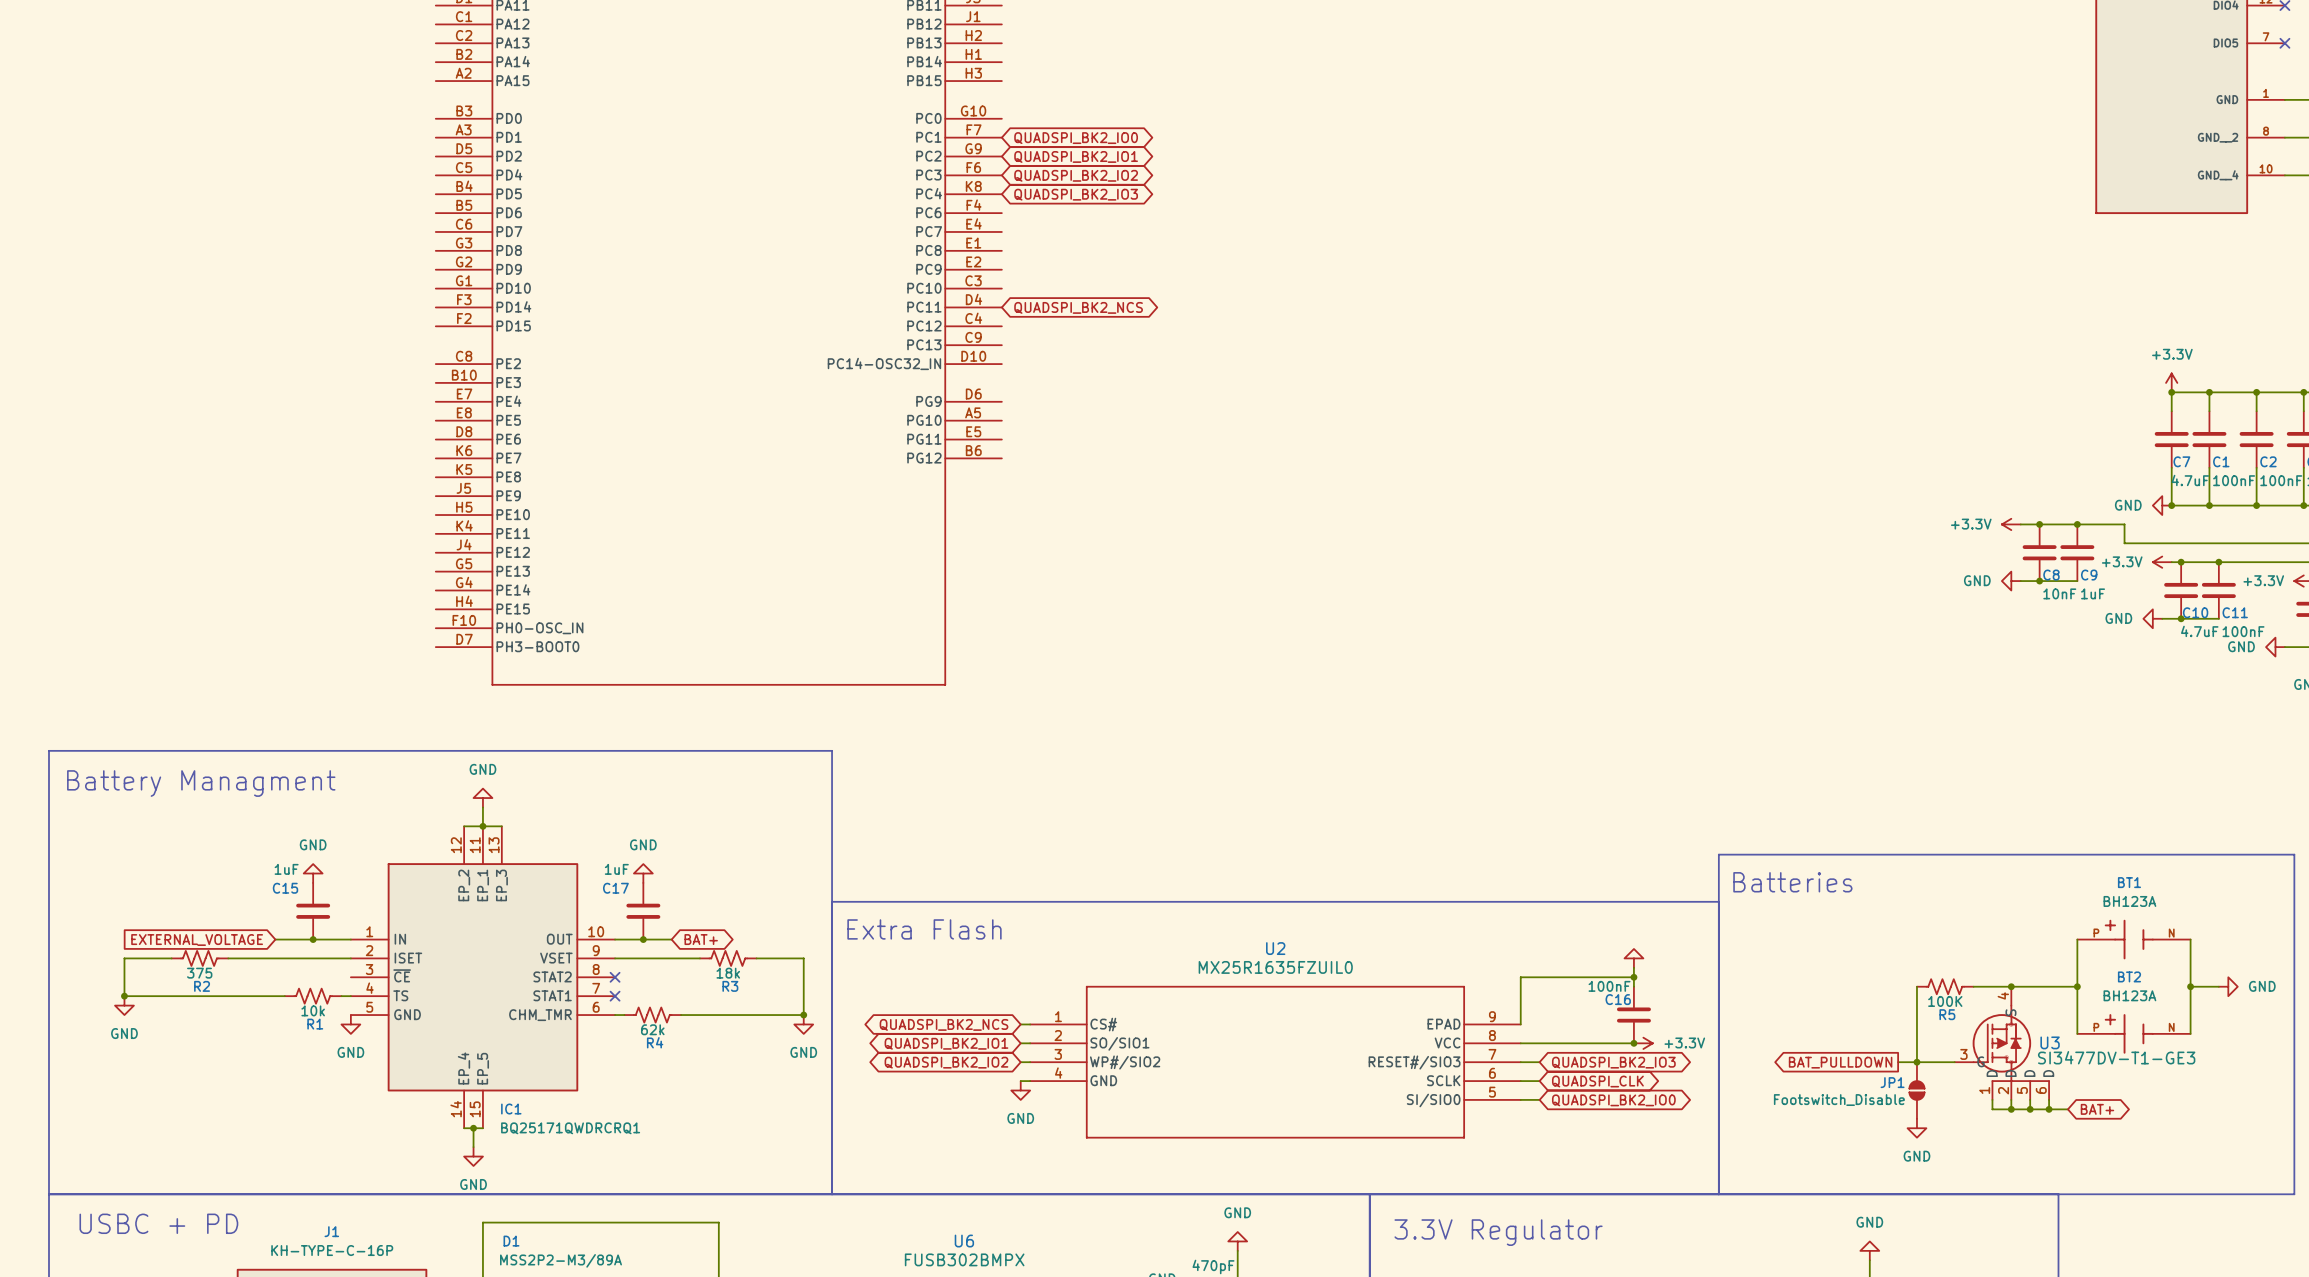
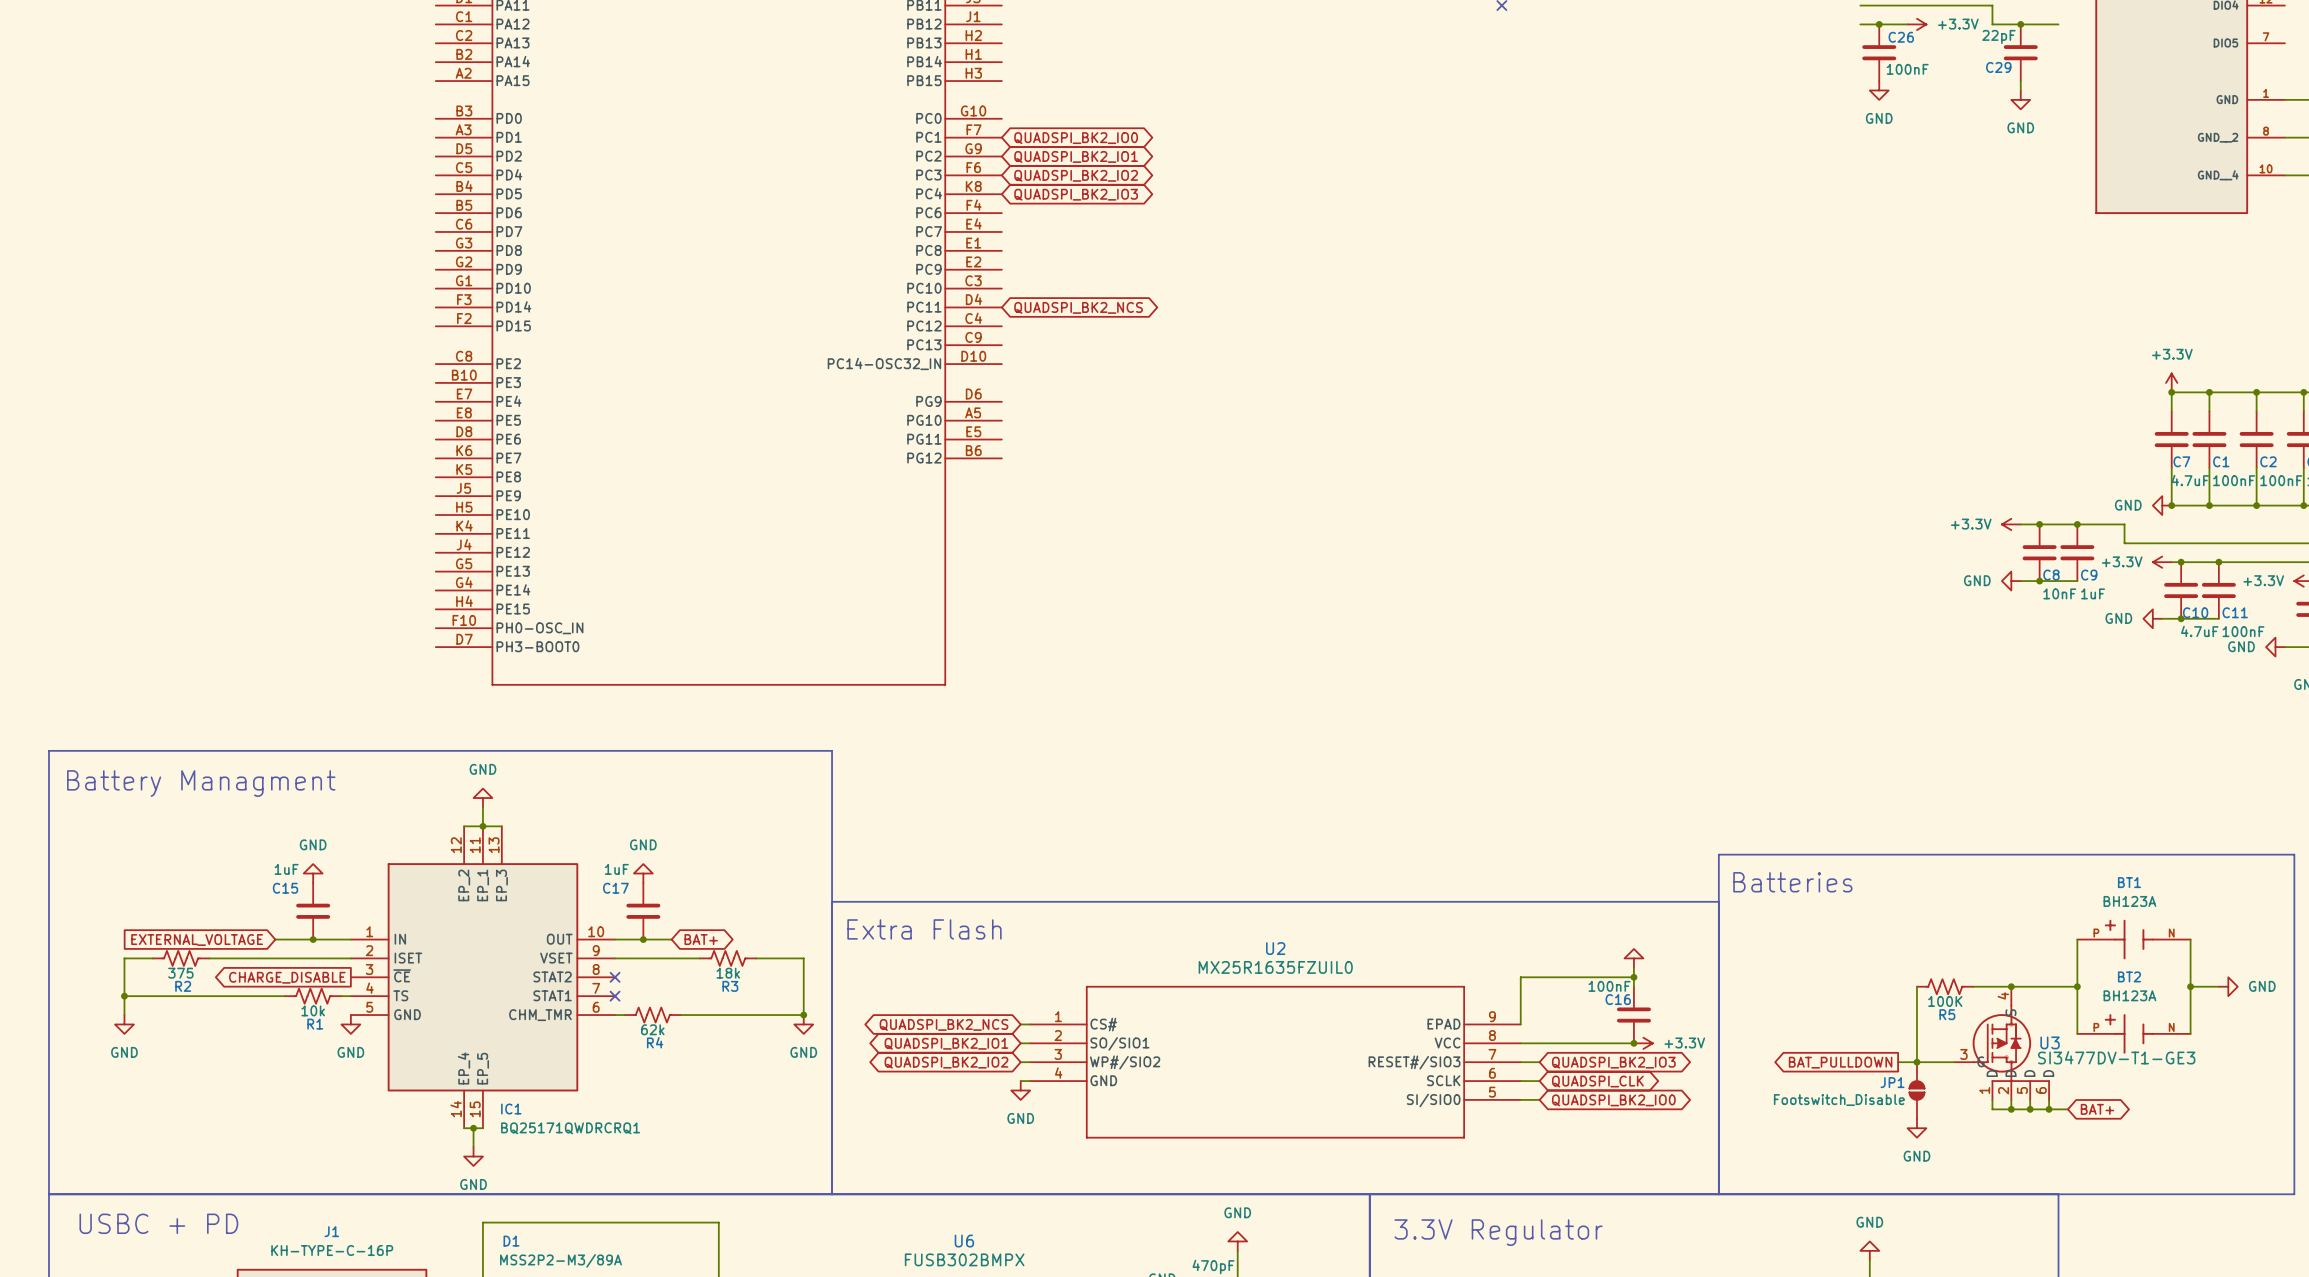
no-connect mark: none -> (1501, 5)
wire: none -> (1860, 5) (1992, 5) (1992, 24) (2058, 24)
no-connect mark: (2284, 5) -> none
wire: none -> (1860, 24) (1907, 24)
junction: none -> (1879, 24)
power symbol: none -> +3.3V (1916, 24)
junction: none -> (2020, 24)
no-connect mark: (2284, 43) -> none
C26: none -> 100nF (1879, 52)
C29: none -> 22pF (2020, 52)
wire: none -> (2020, 81) (2020, 90)
power symbol: none -> GND (1879, 90)
power symbol: none -> GND (2020, 99)
R2 position: (199, 958) -> (181, 958)
global label: none -> CHARGE_DISABLE (287, 977)
power symbol position: GND (124, 1005) -> GND (124, 1024)

